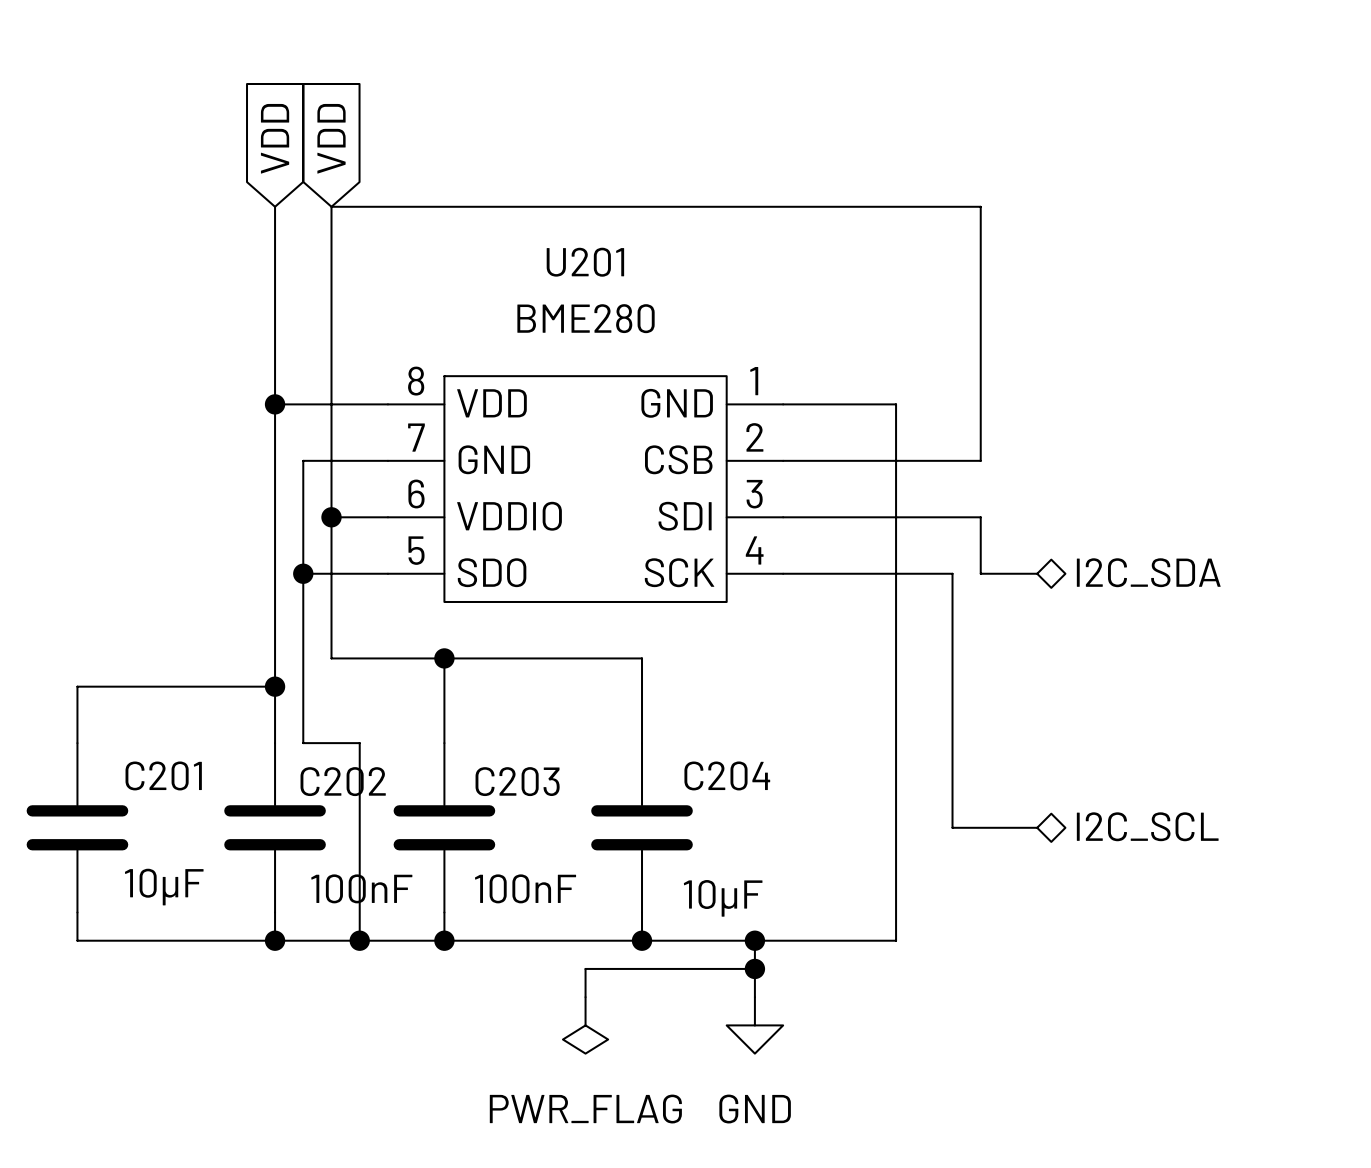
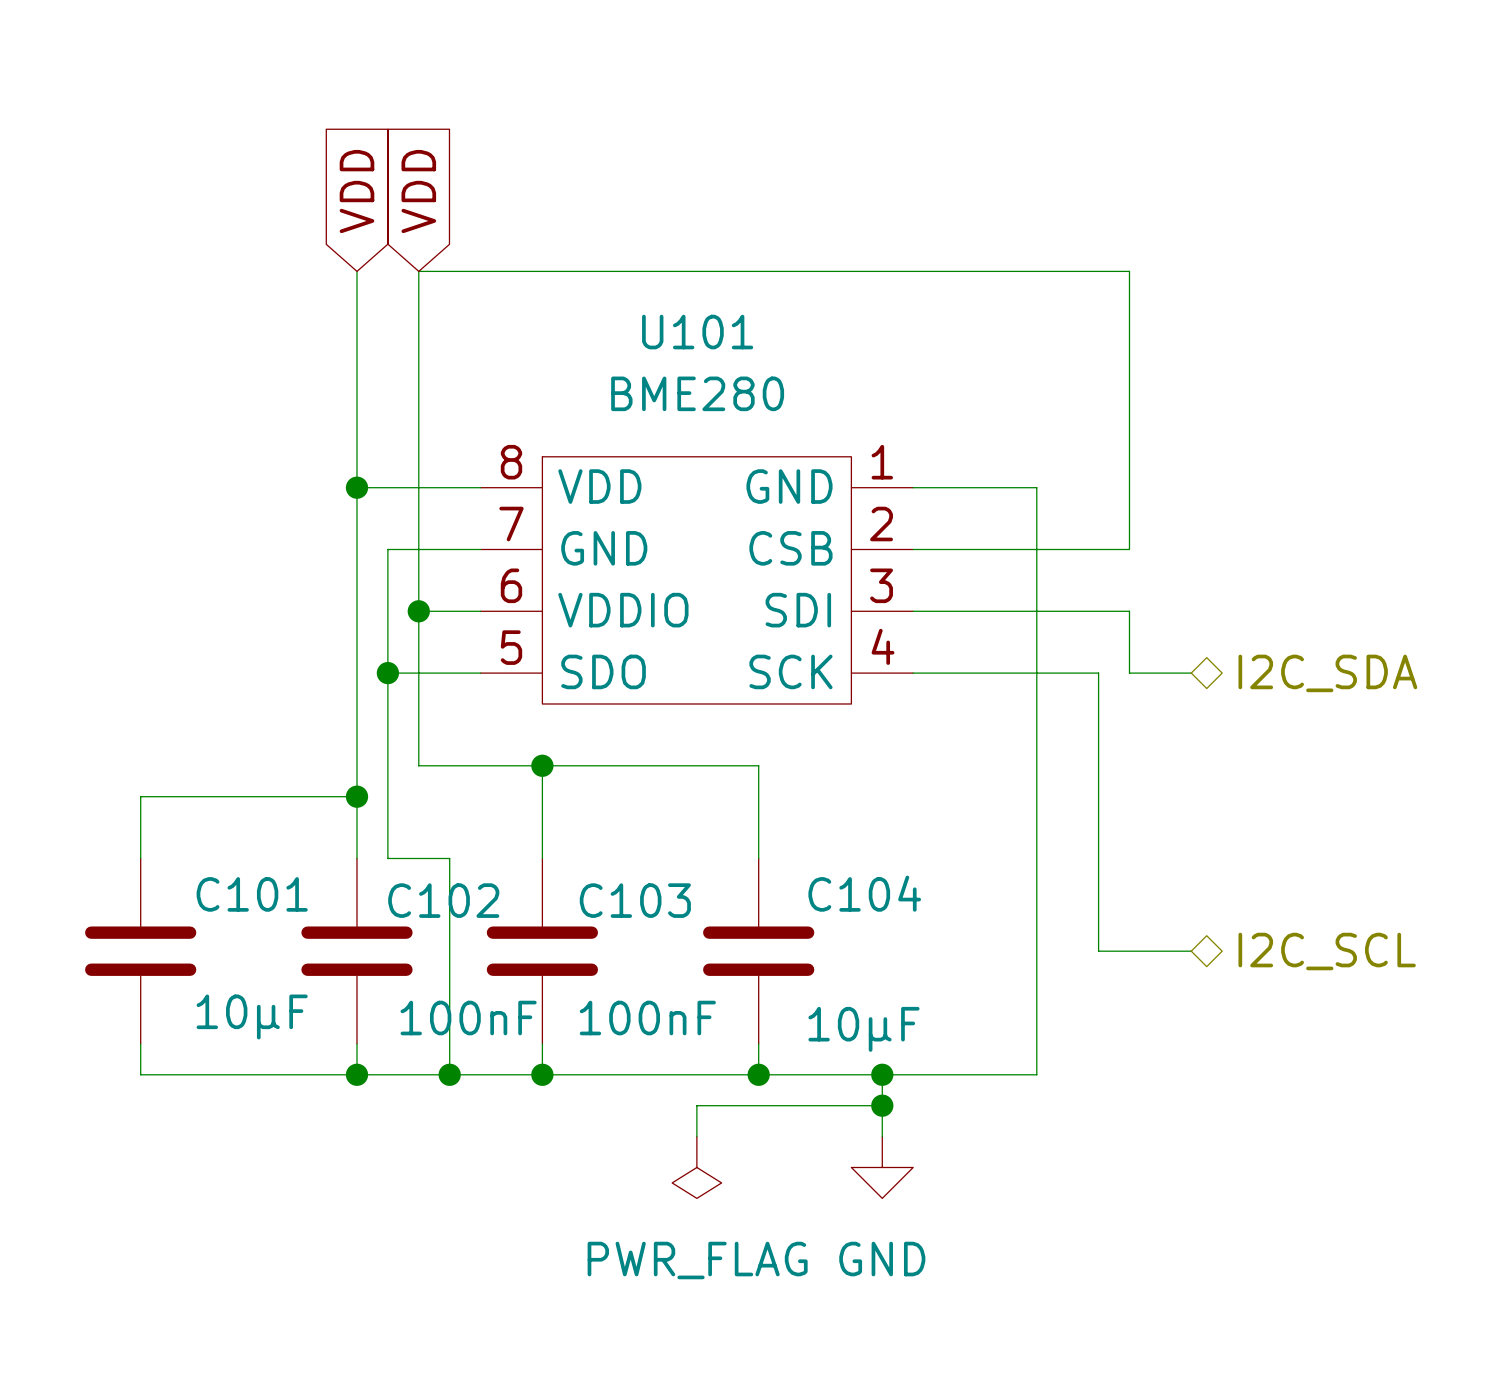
U201 name: U201 (585, 262) -> U101 (697, 332)
C201 name: C201 (163, 775) -> C101 (252, 894)
C204 name: C204 (727, 775) -> C104 (864, 893)
C202 name: C202 (343, 781) -> C102 (443, 900)
C203 name: C203 (517, 781) -> C103 (635, 900)

